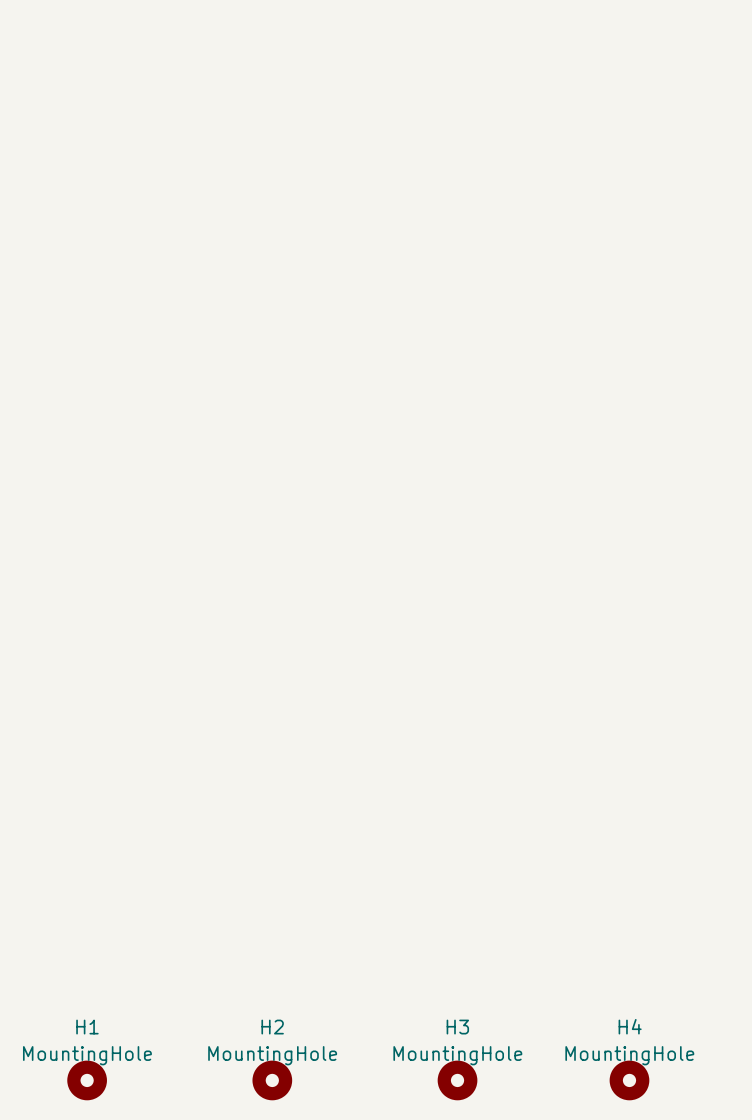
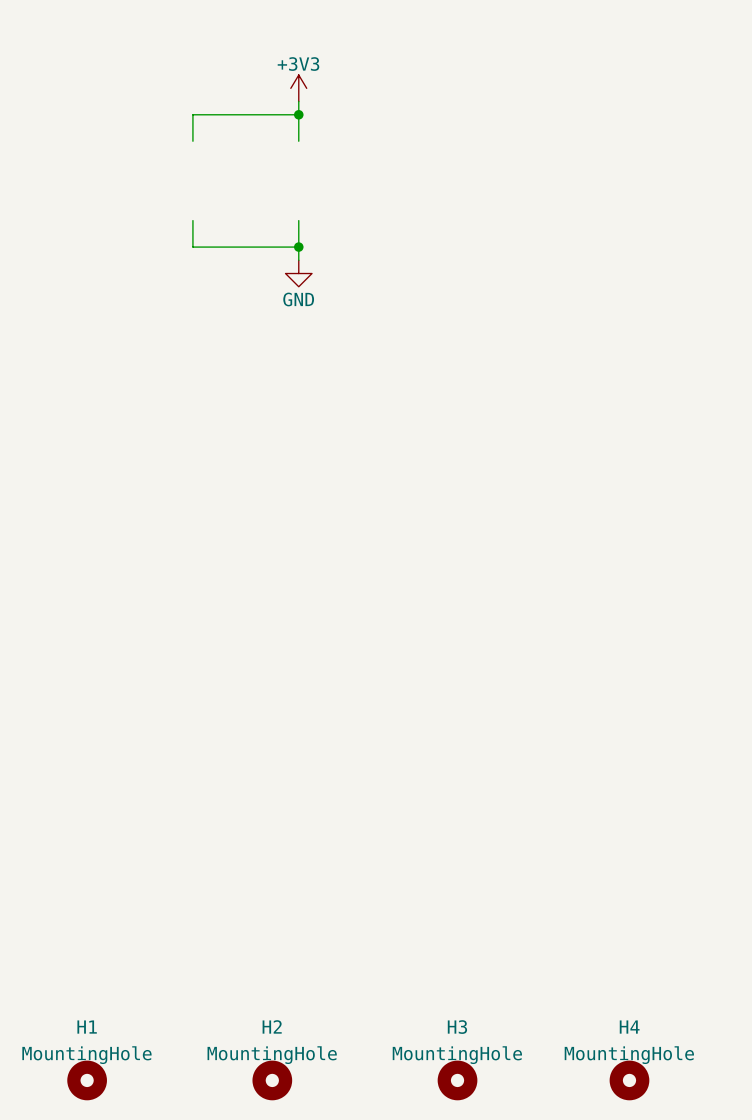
power symbol: none -> +3V3 (298, 88)
wire: none -> (298, 101) (298, 141)
wire: none -> (298, 114) (192, 114) (192, 141)
junction: none -> (298, 114)
wire: none -> (192, 220) (192, 247) (298, 247)
wire: none -> (298, 220) (298, 260)
junction: none -> (298, 247)
power symbol: none -> GND (298, 273)

